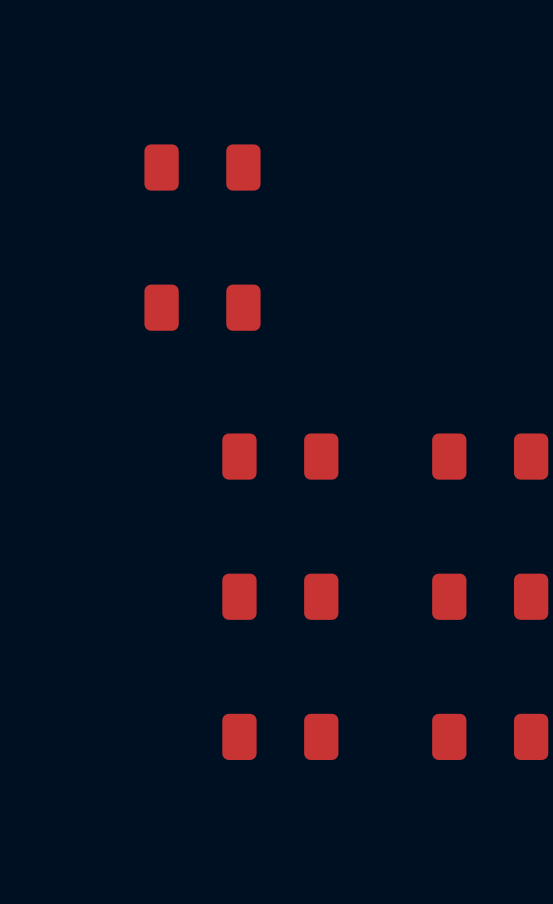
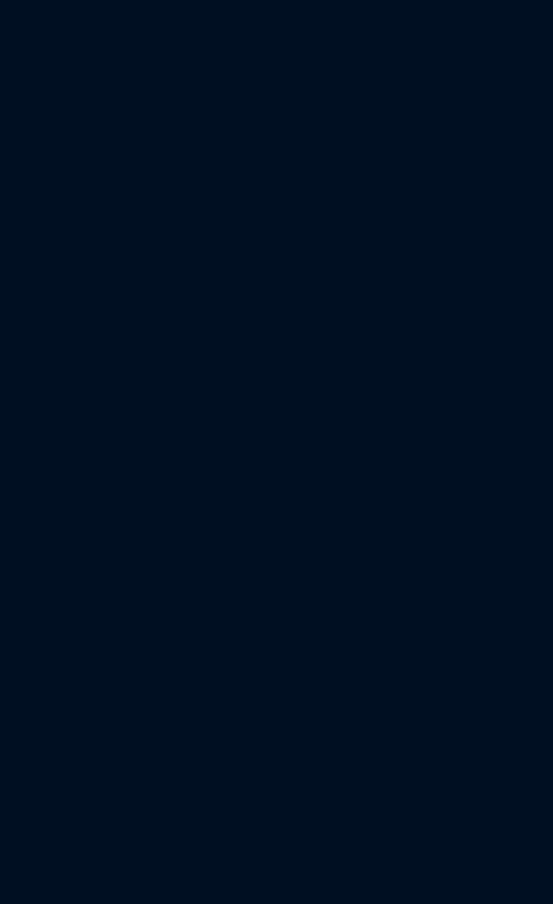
part: (202, 167) -> none
part: (202, 307) -> none
part: (280, 456) -> none
part: (490, 456) -> none
part: (280, 596) -> none
part: (490, 596) -> none
part: (280, 736) -> none
part: (490, 736) -> none

